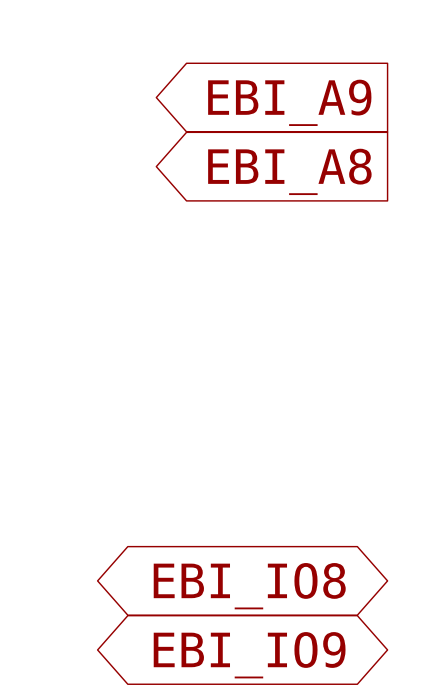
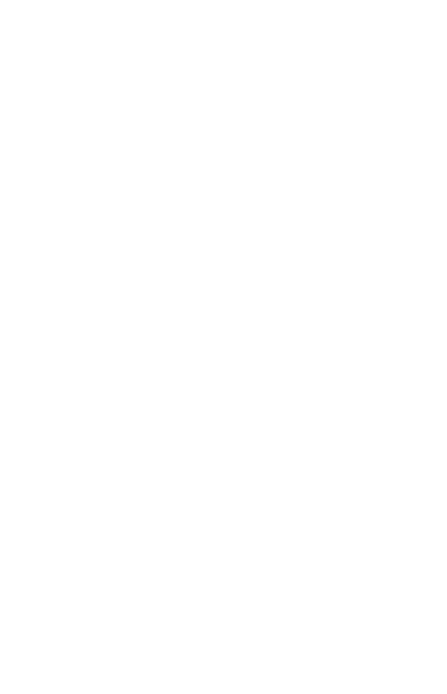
global label: EBI_A9 (289, 102) -> none
global label: EBI_A8 (289, 171) -> none
global label: EBI_IO8 (249, 586) -> none
global label: EBI_IO9 (249, 655) -> none

